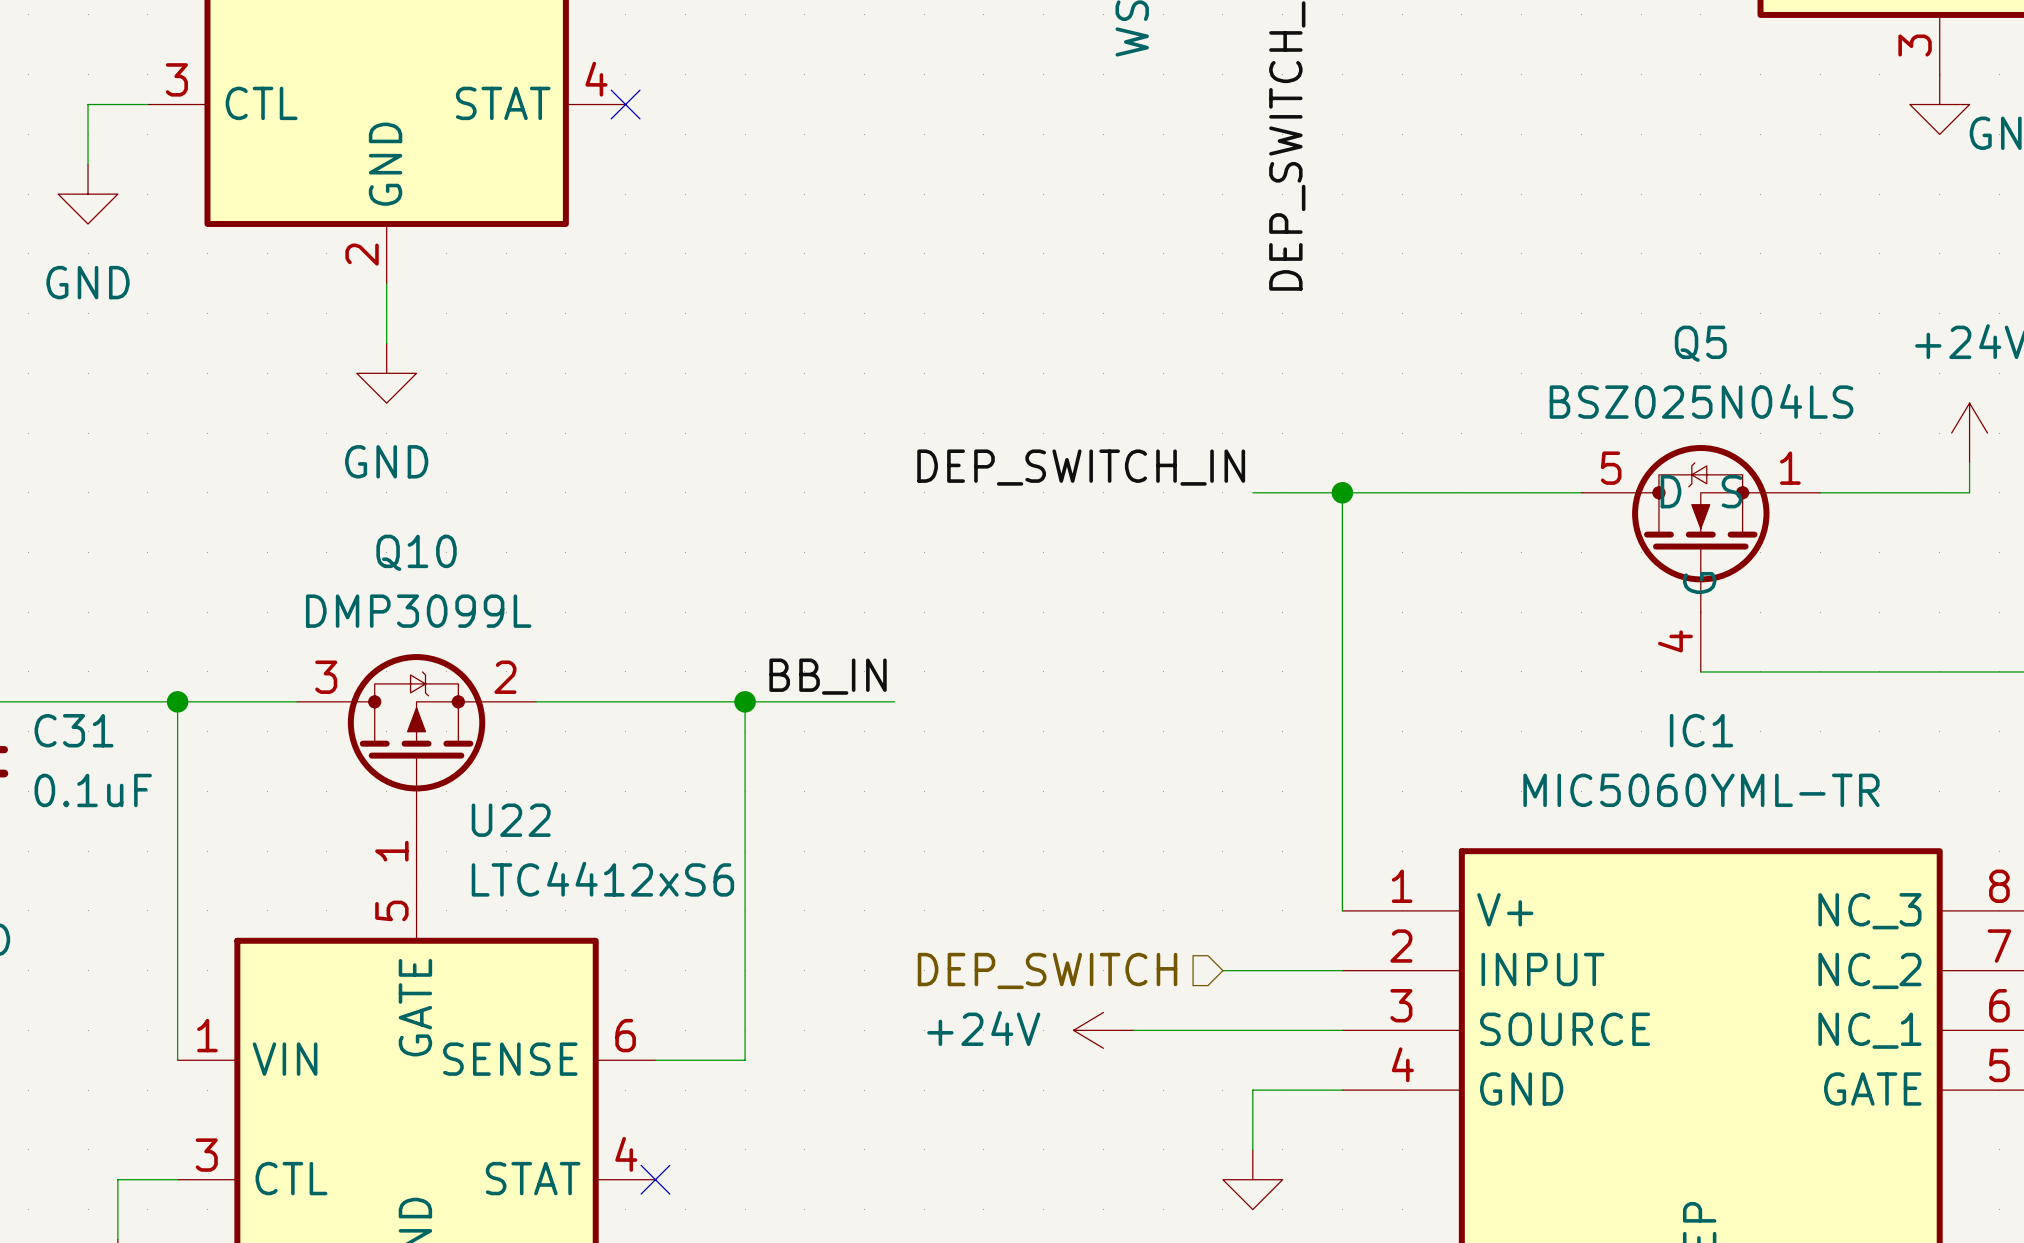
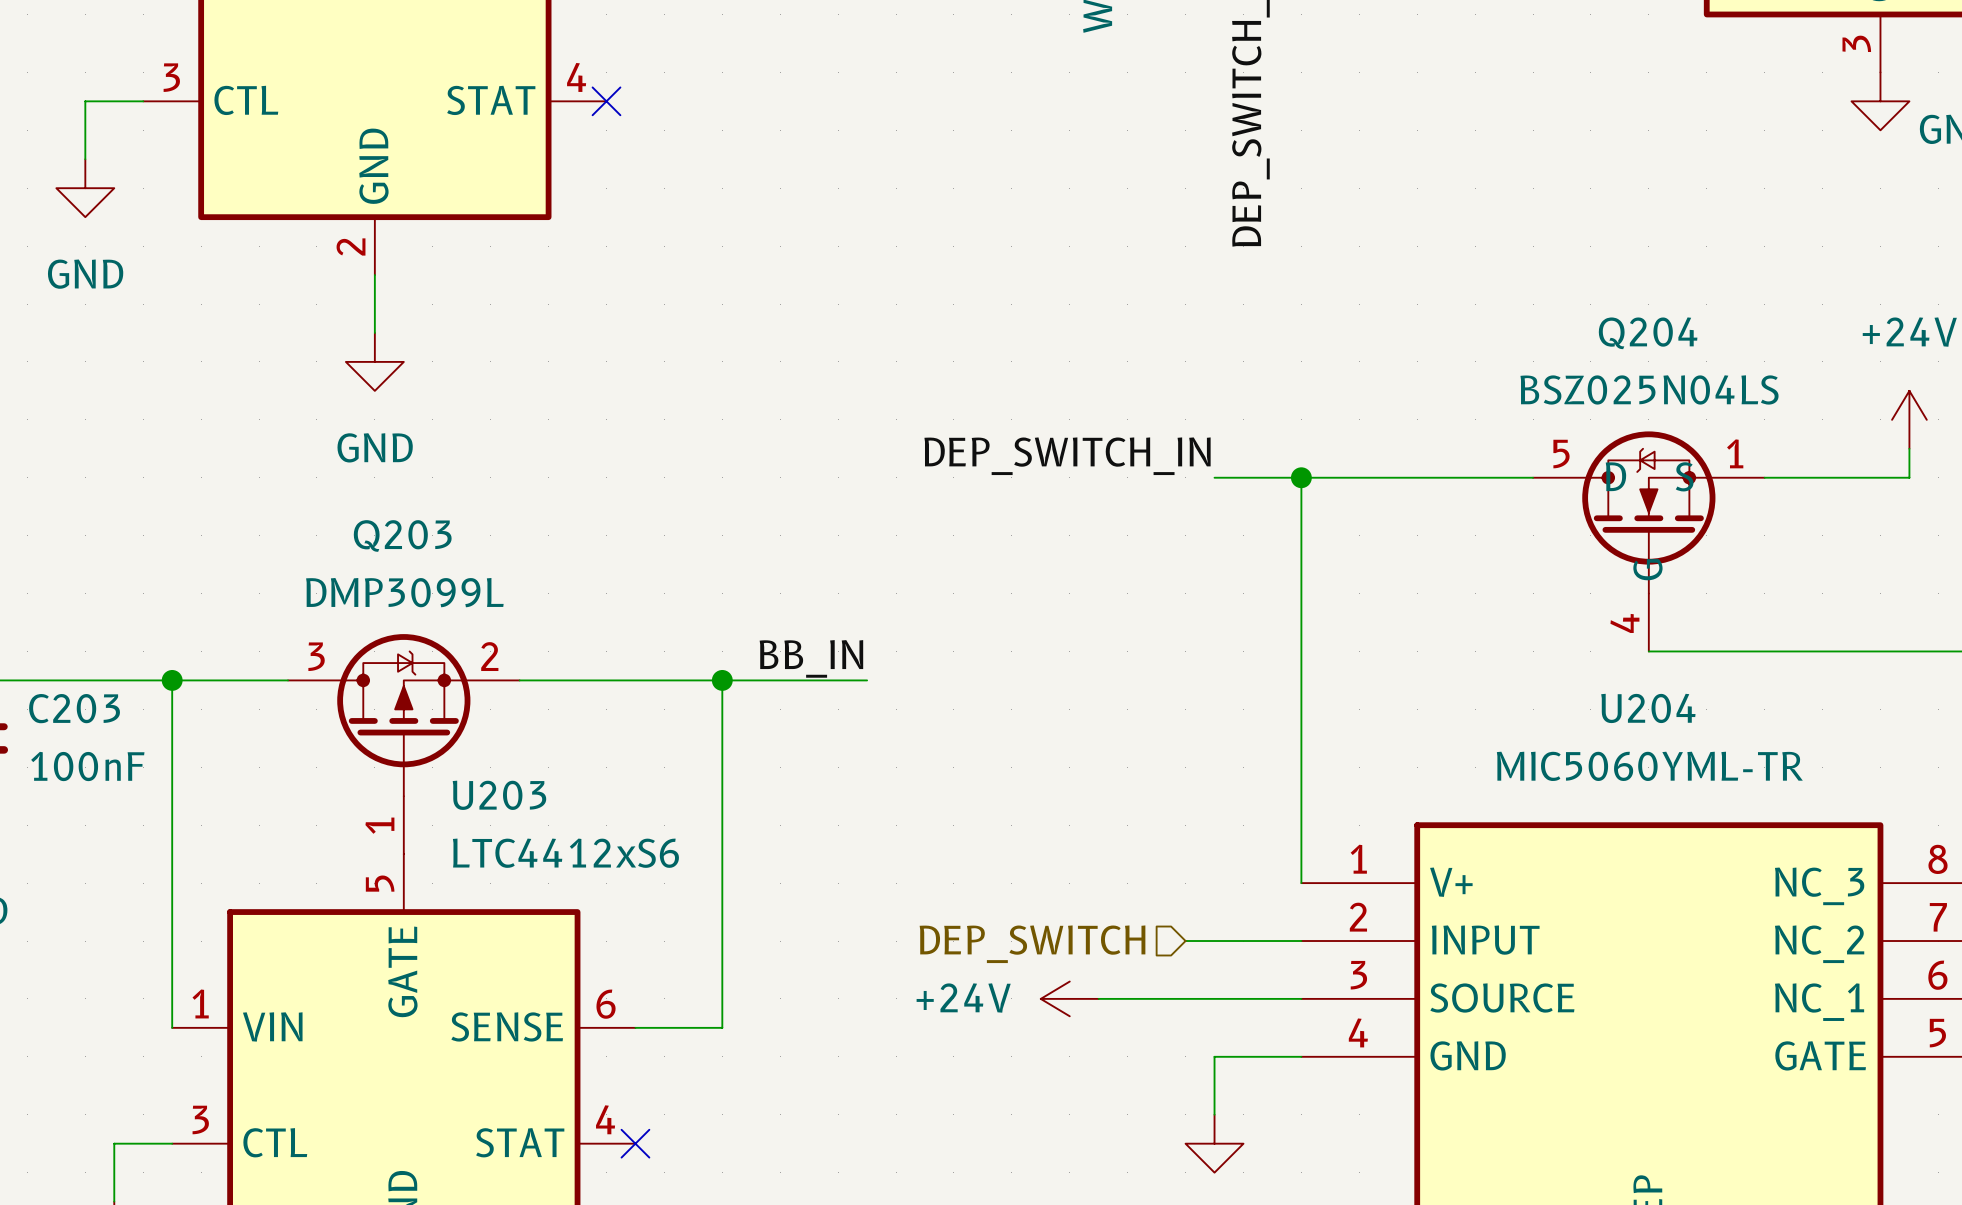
Q5 name: Q5 (1700, 343) -> Q204 (1648, 333)
Q10 name: Q10 (416, 552) -> Q203 (402, 535)
C31 name: C31 (74, 730) -> C203 (74, 708)
IC1 name: IC1 (1701, 730) -> U204 (1648, 708)
C31 value: 0.1uF (93, 790) -> 100nF (87, 766)
U22 name: U22 (511, 820) -> U203 (499, 795)

